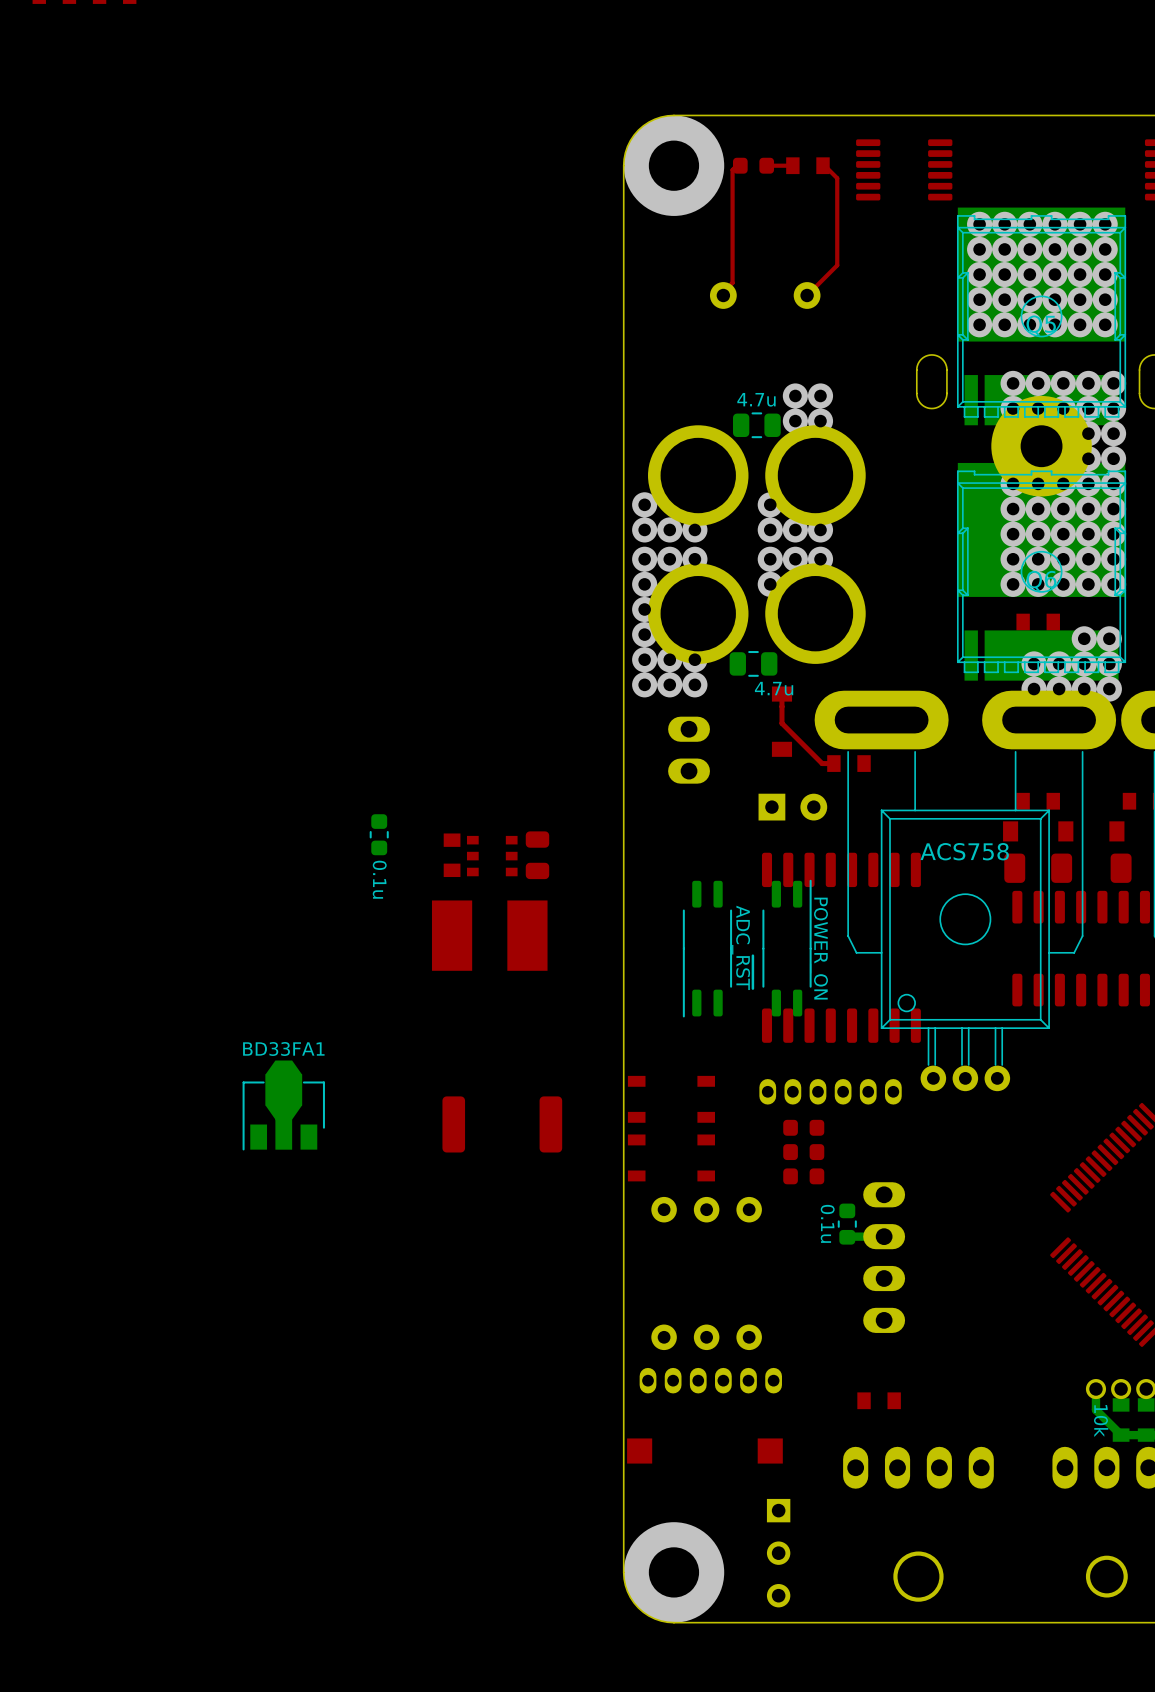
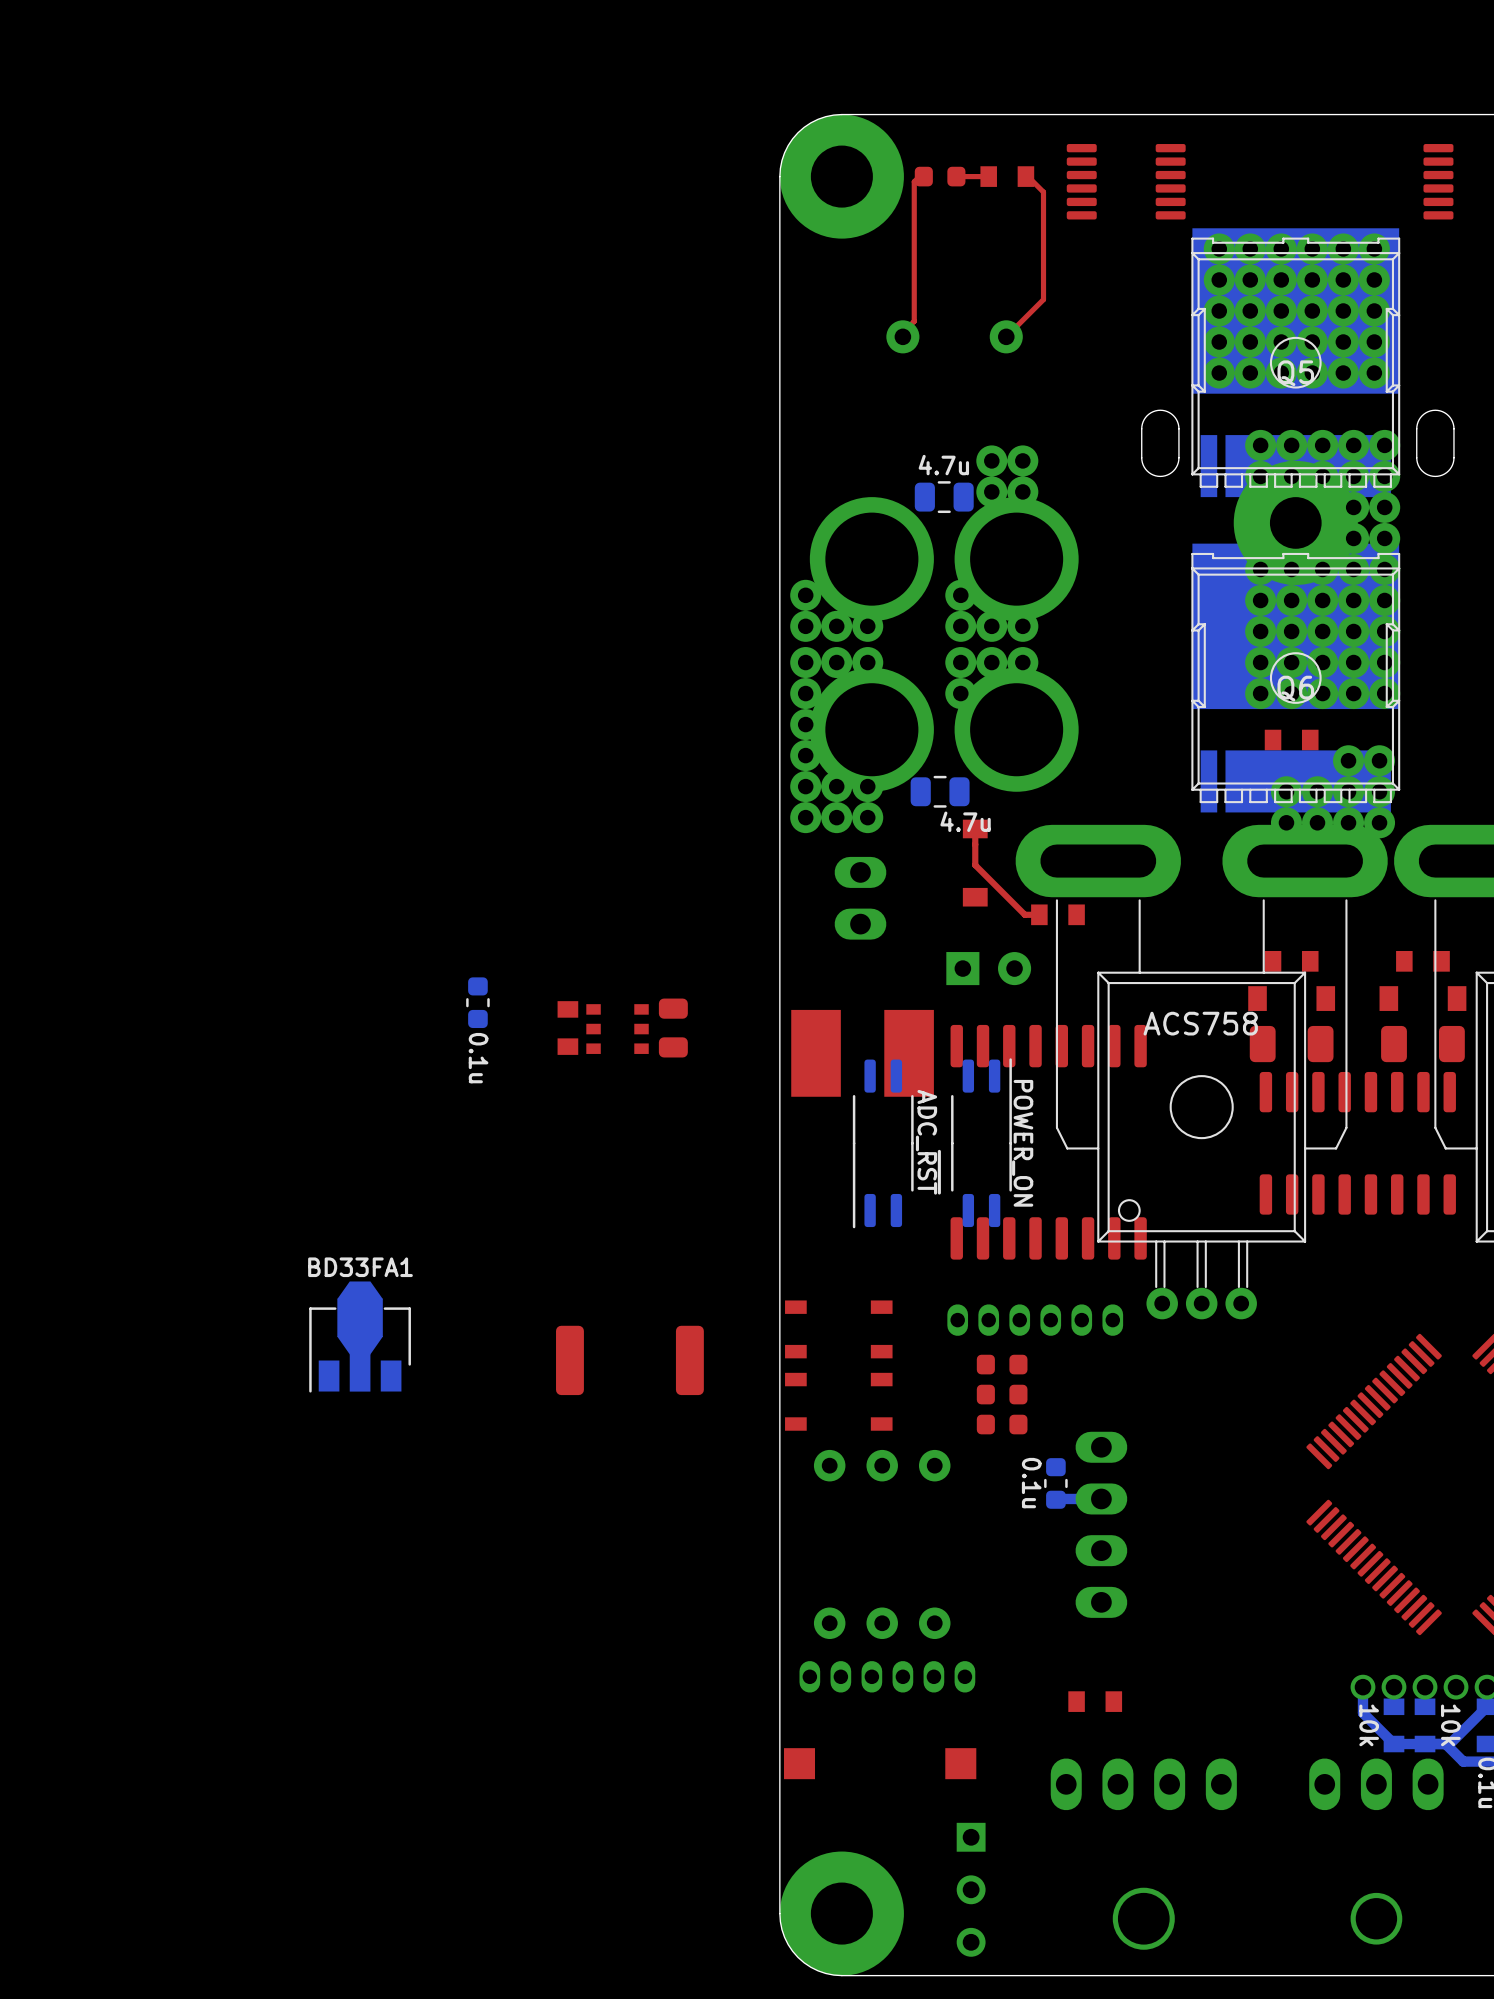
part position: (489, 935) -> (862, 1053)

